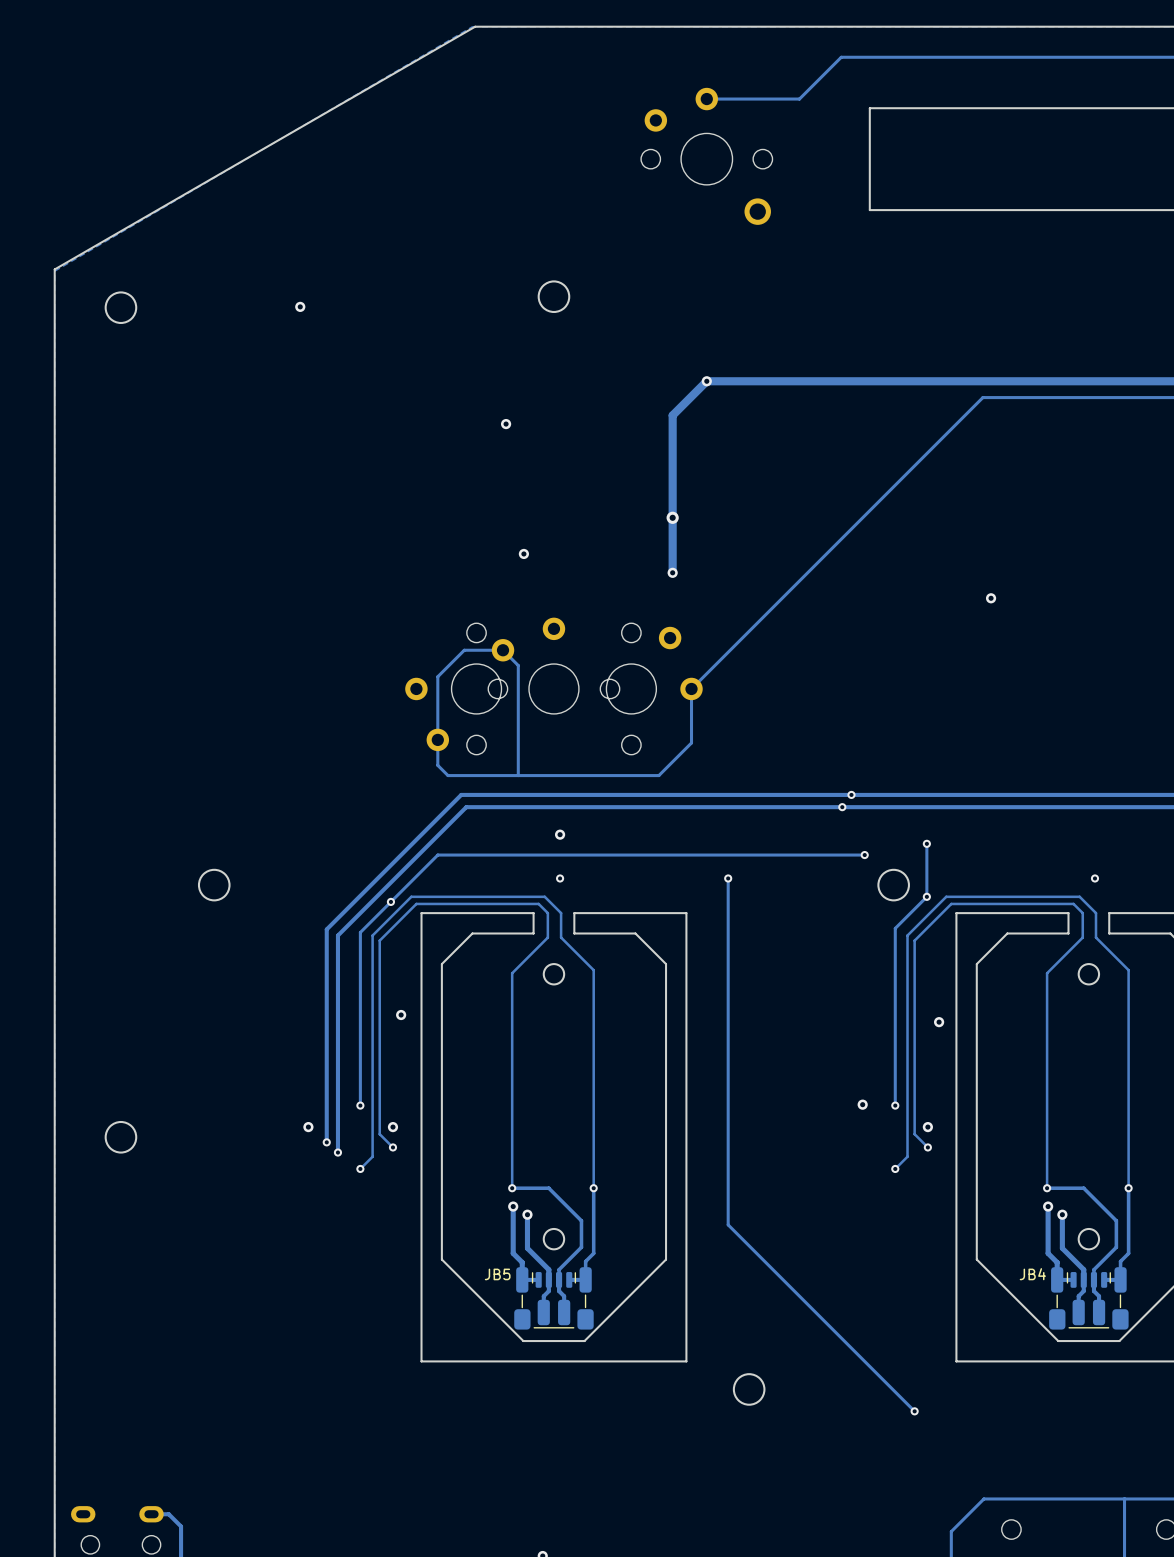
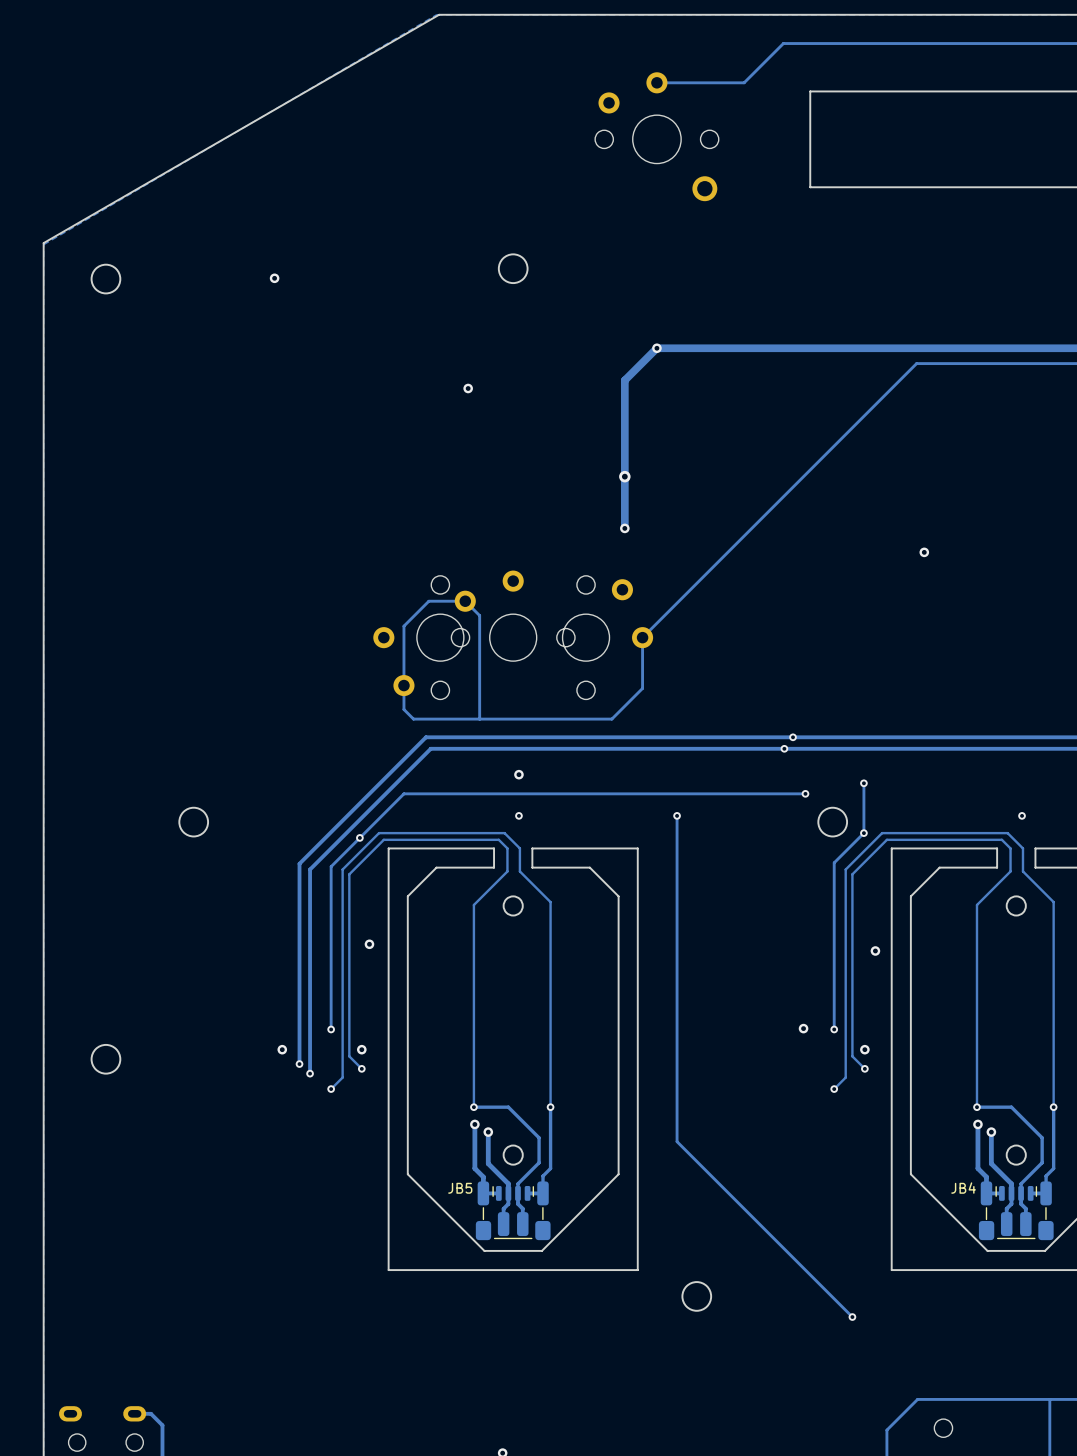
via: (523, 553) -> none

